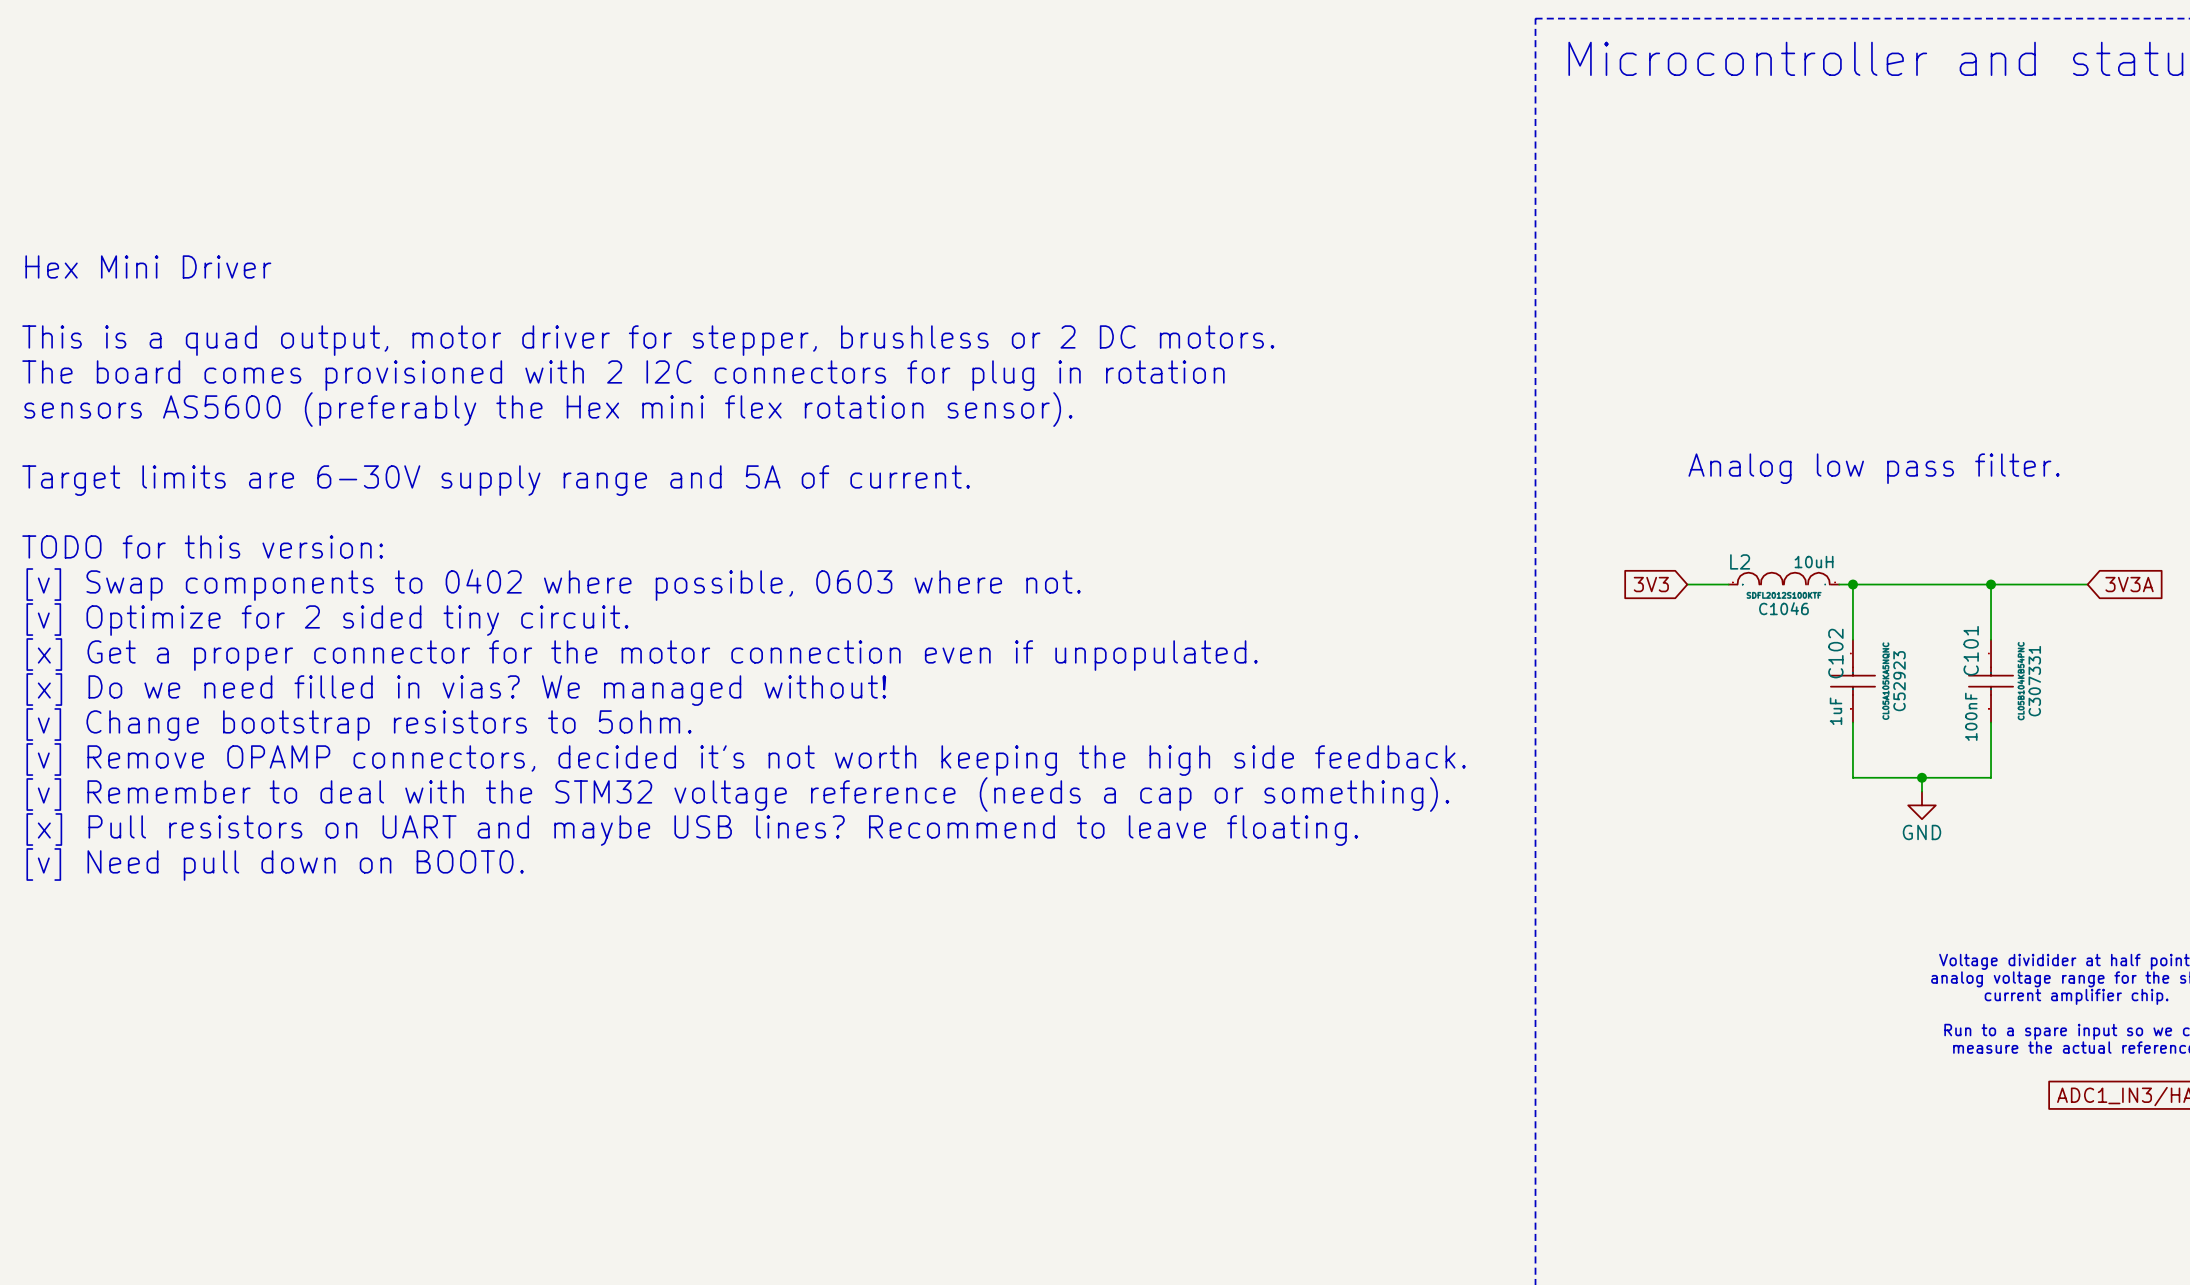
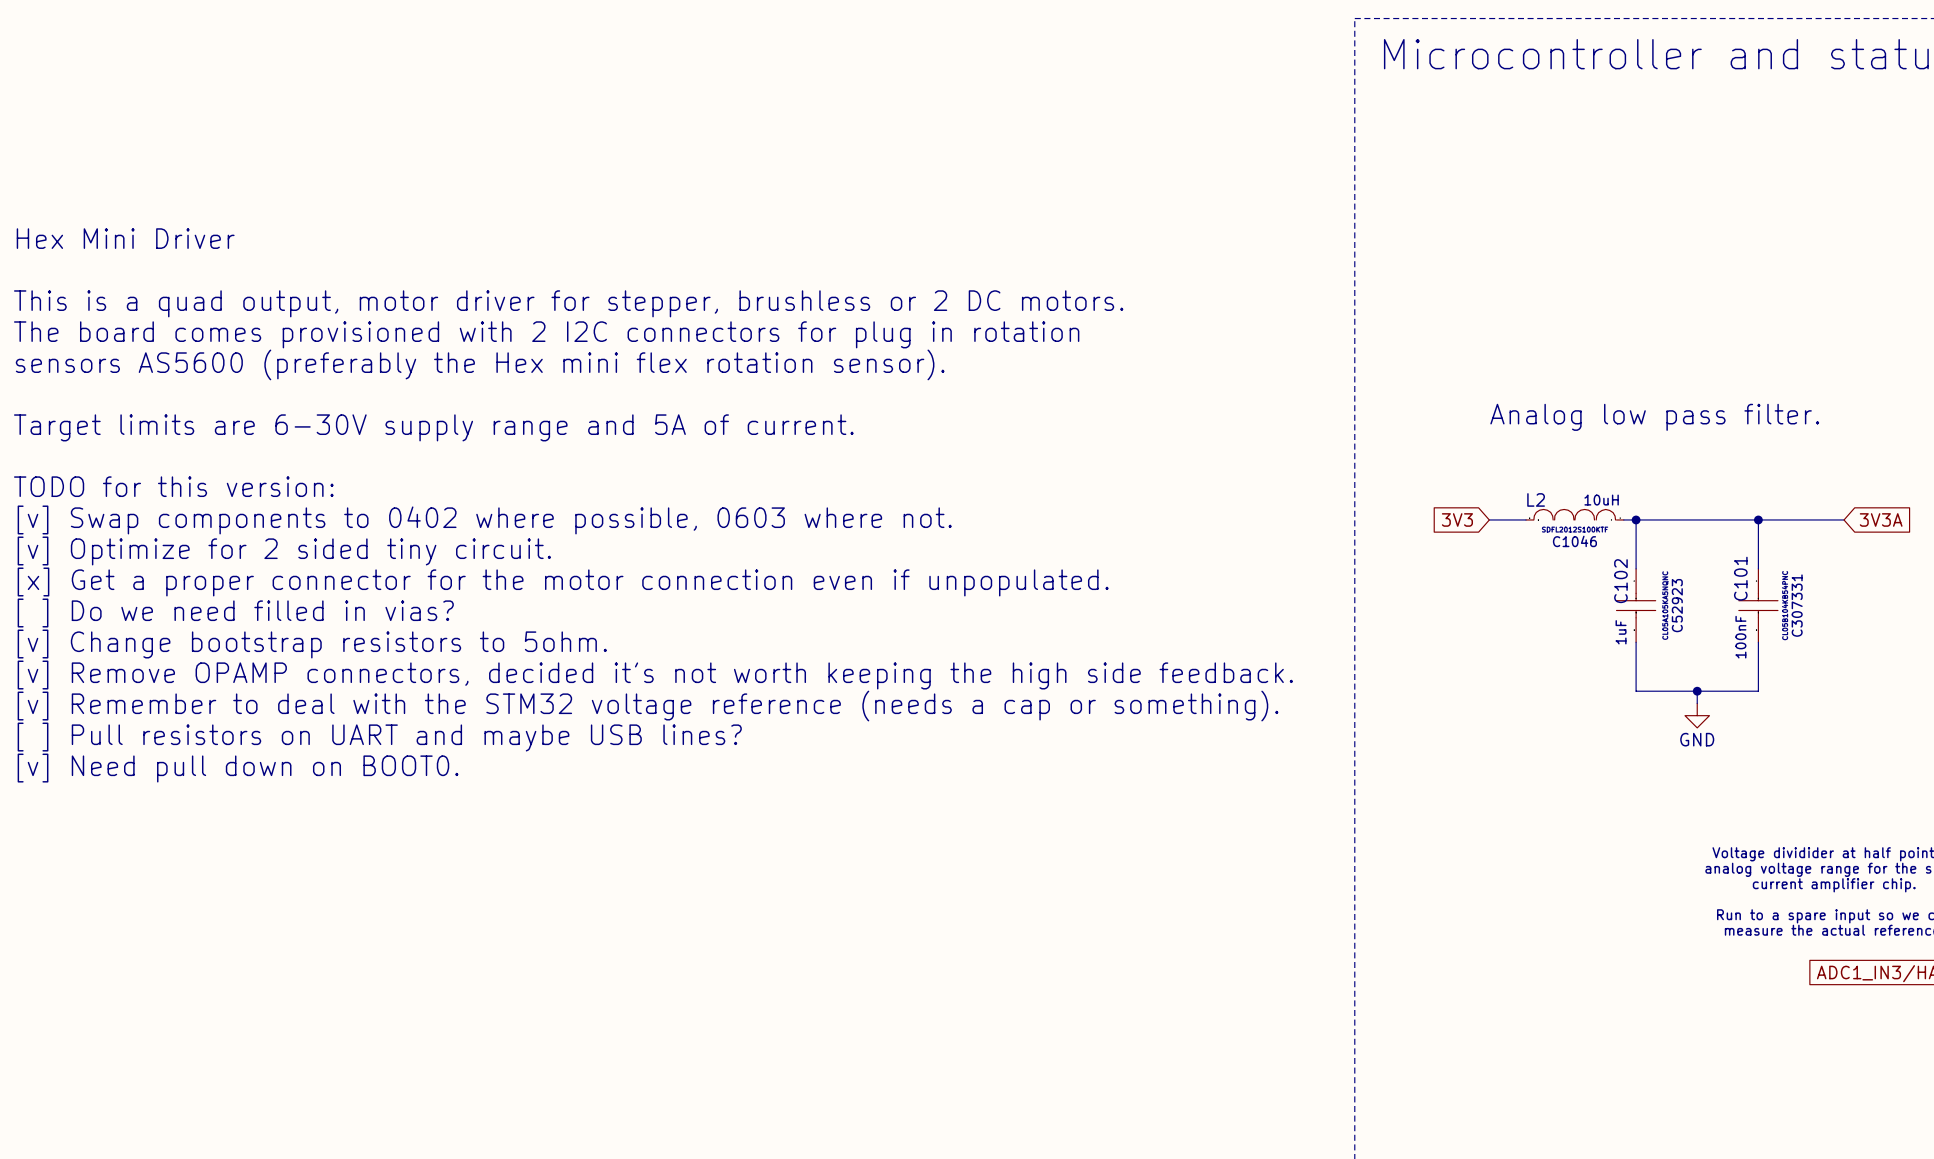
text: [x] Do we need filled in vias? We managed without! (456, 689) -> [ ] Do we need filled in vias? (235, 613)
text: [x] Pull resistors on UART and maybe USB lines? Recommend to leave floating. (692, 829) -> [ ] Pull resistors on UART and maybe USB lines? (379, 737)

